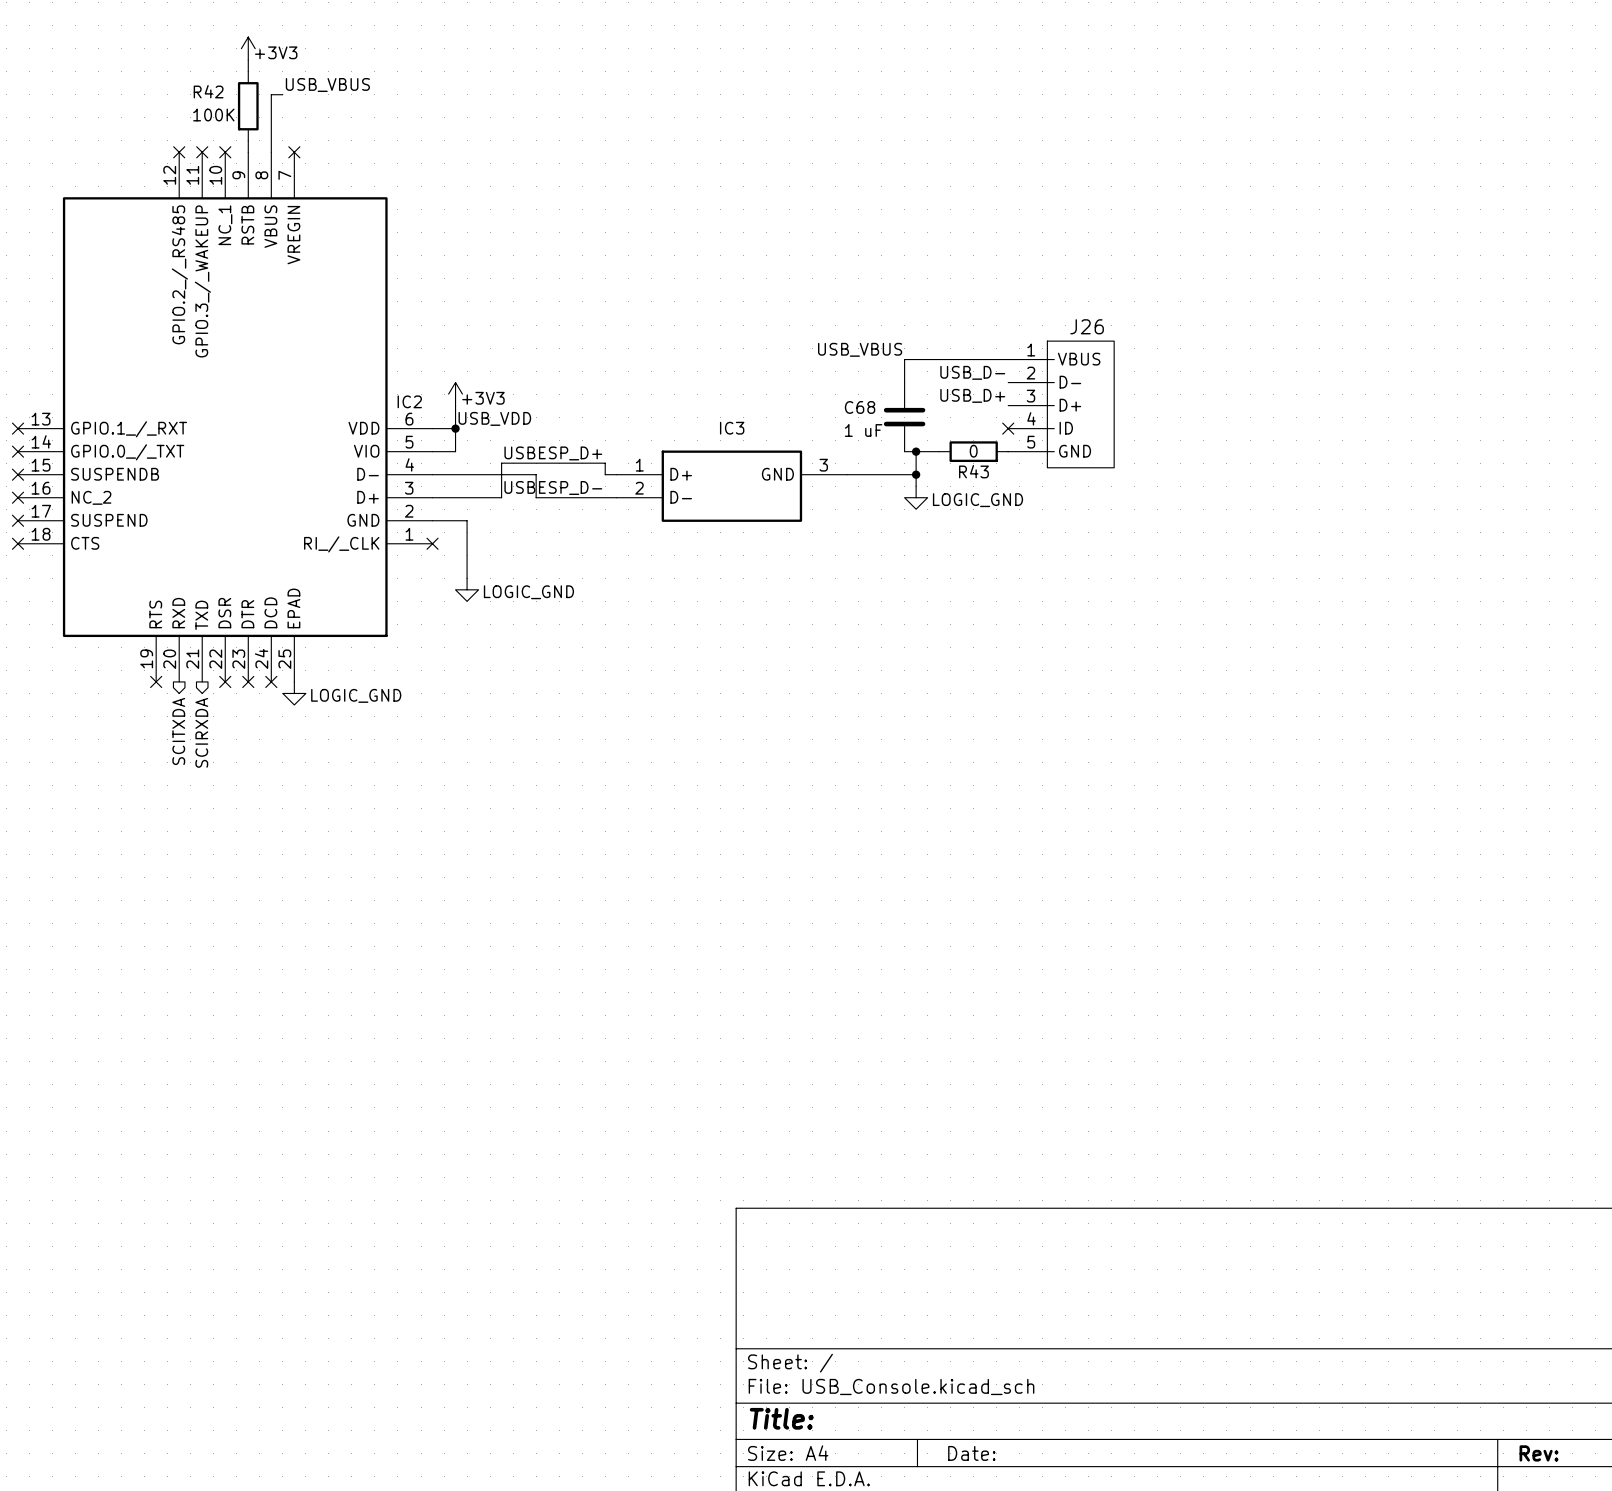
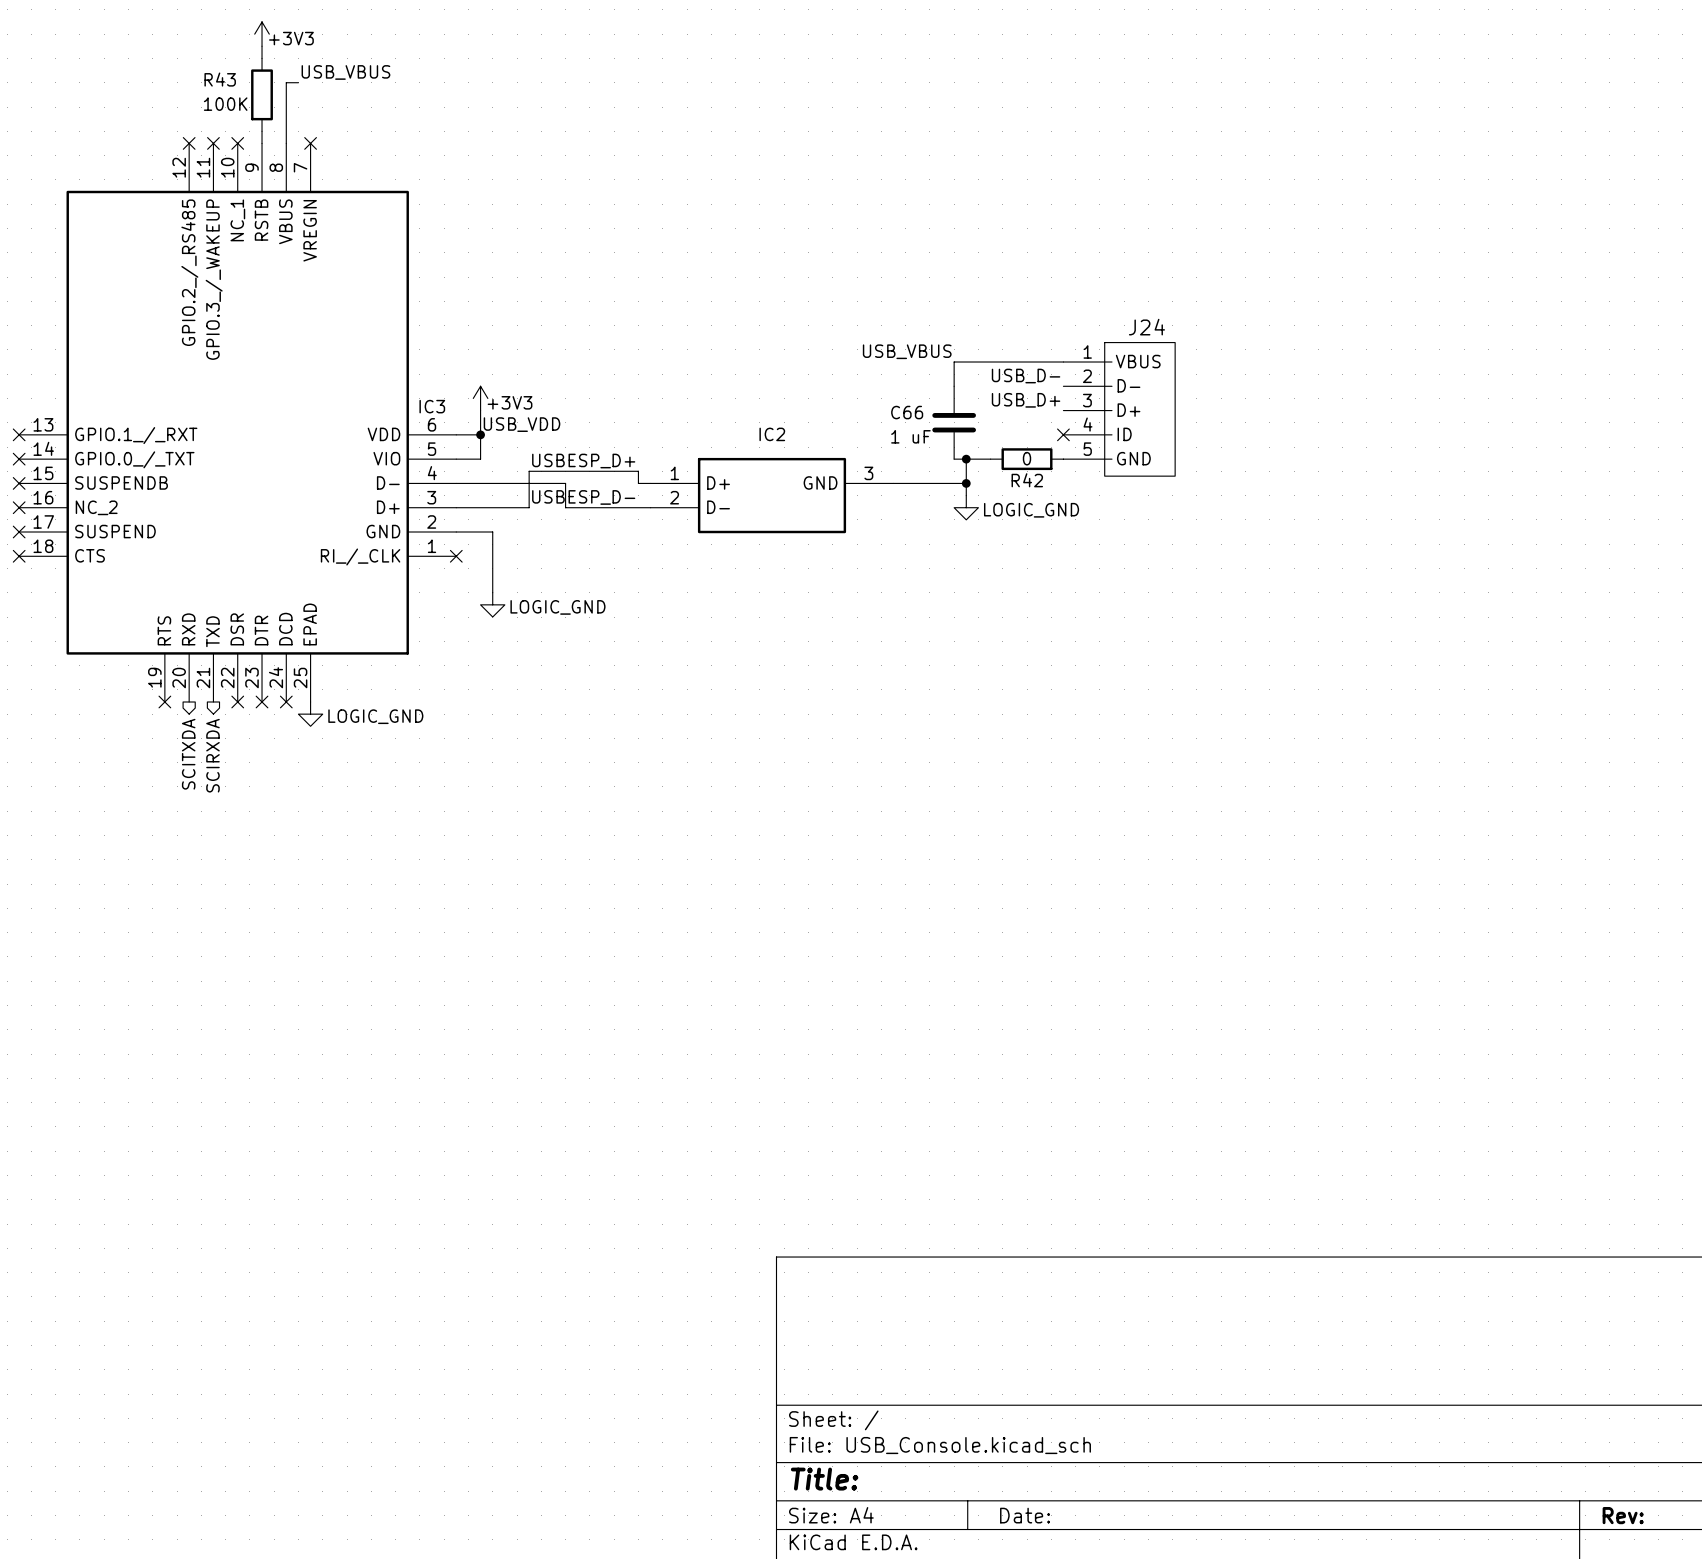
R42 name: R42 (208, 91) -> R43 (220, 79)
J26 name: J26 (1087, 326) -> J24 (1146, 327)
IC2 name: IC2 (409, 401) -> IC3 (432, 406)
C68 name: C68 (860, 407) -> C66 (907, 412)
IC3 name: IC3 (732, 428) -> IC2 (772, 434)
R43 name: R43 (973, 471) -> R42 (1027, 480)

